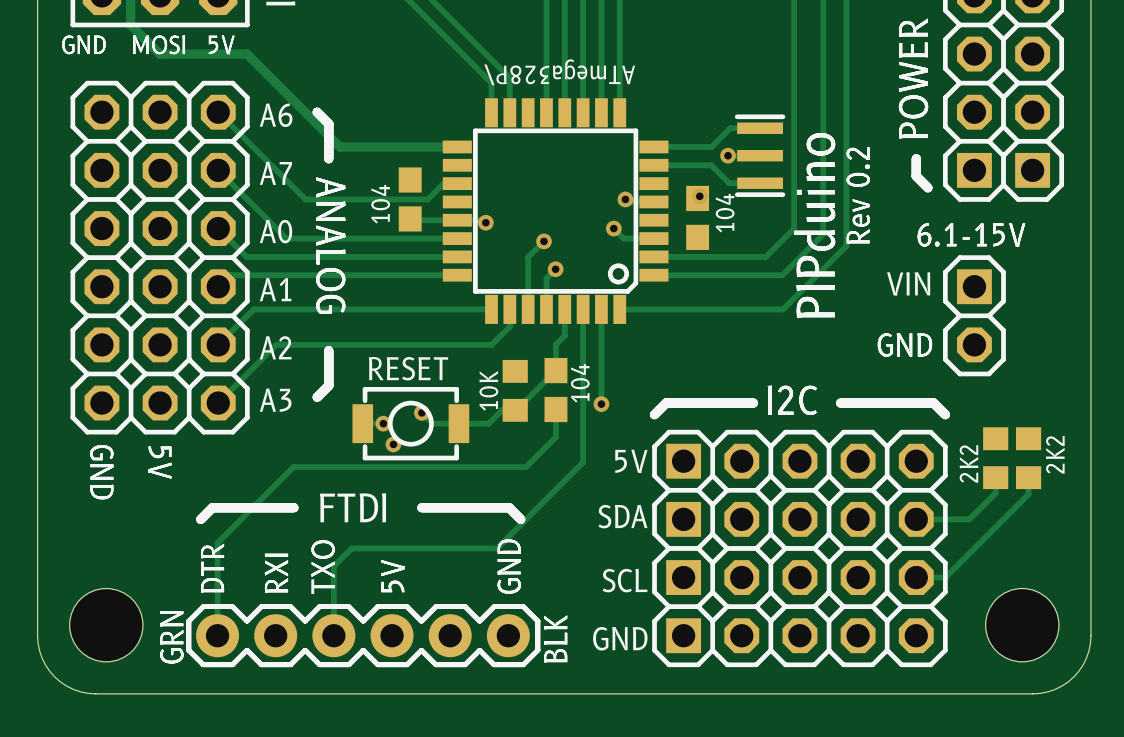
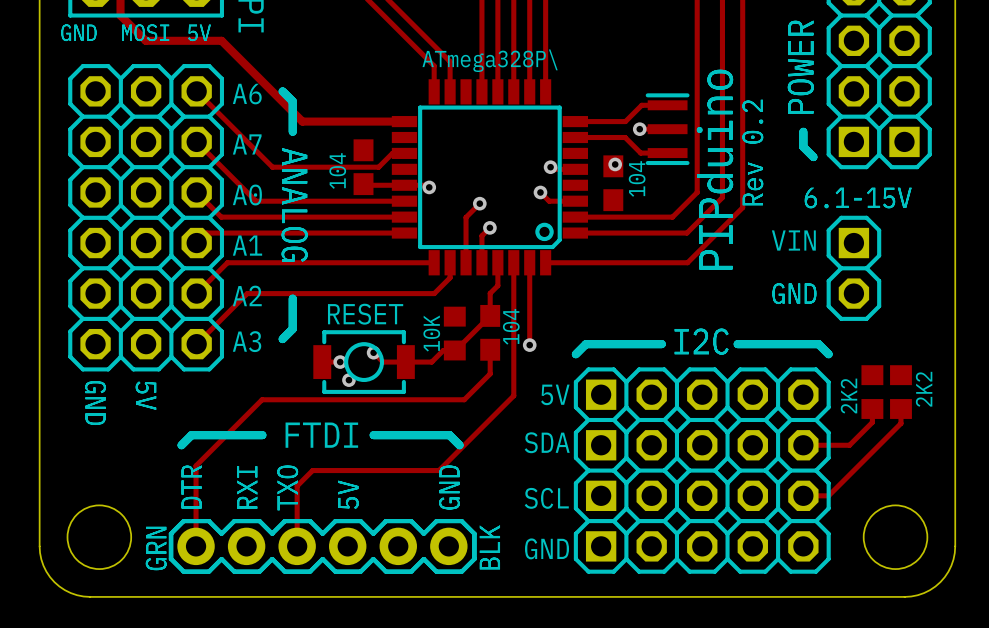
text rotation: 0° (559, 72) -> 180° (490, 60)

